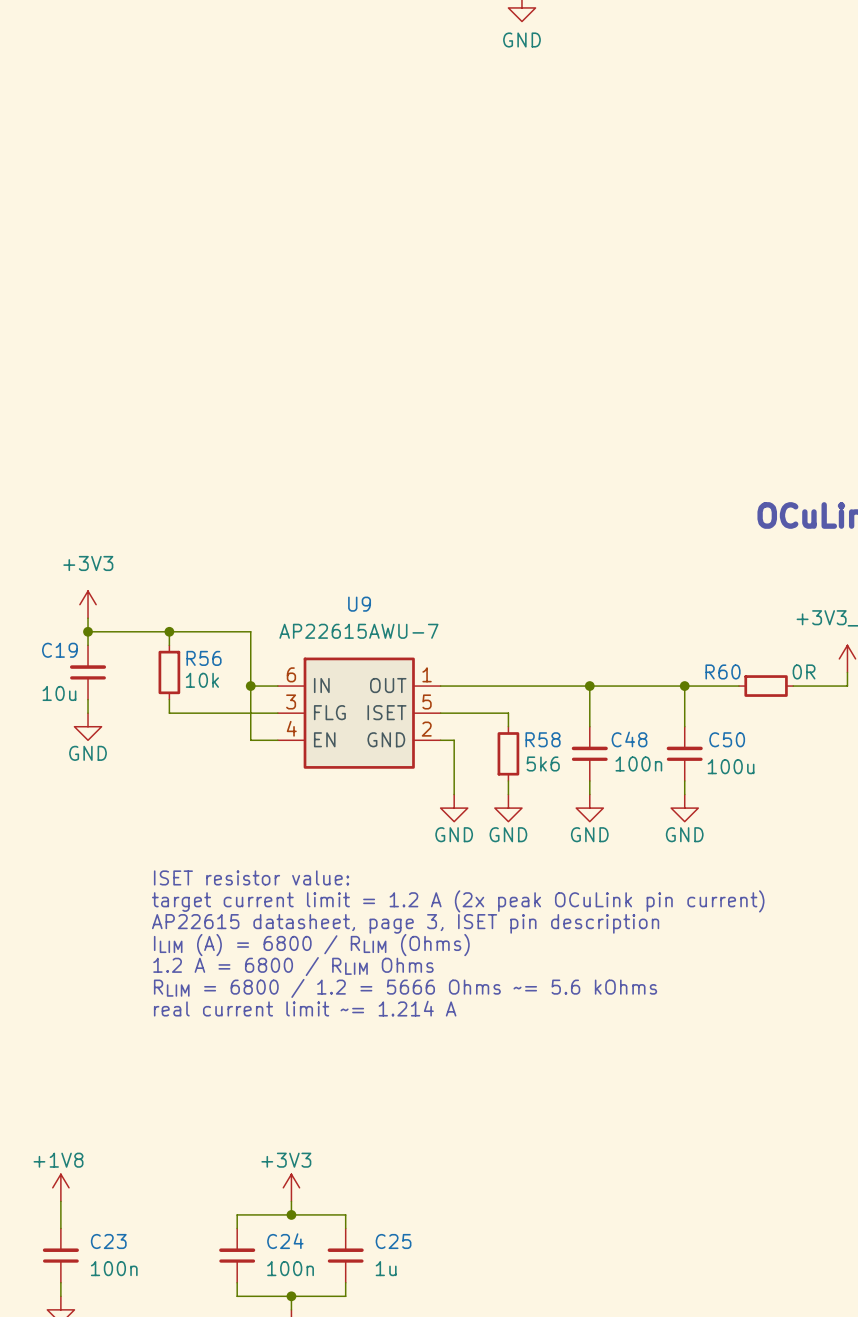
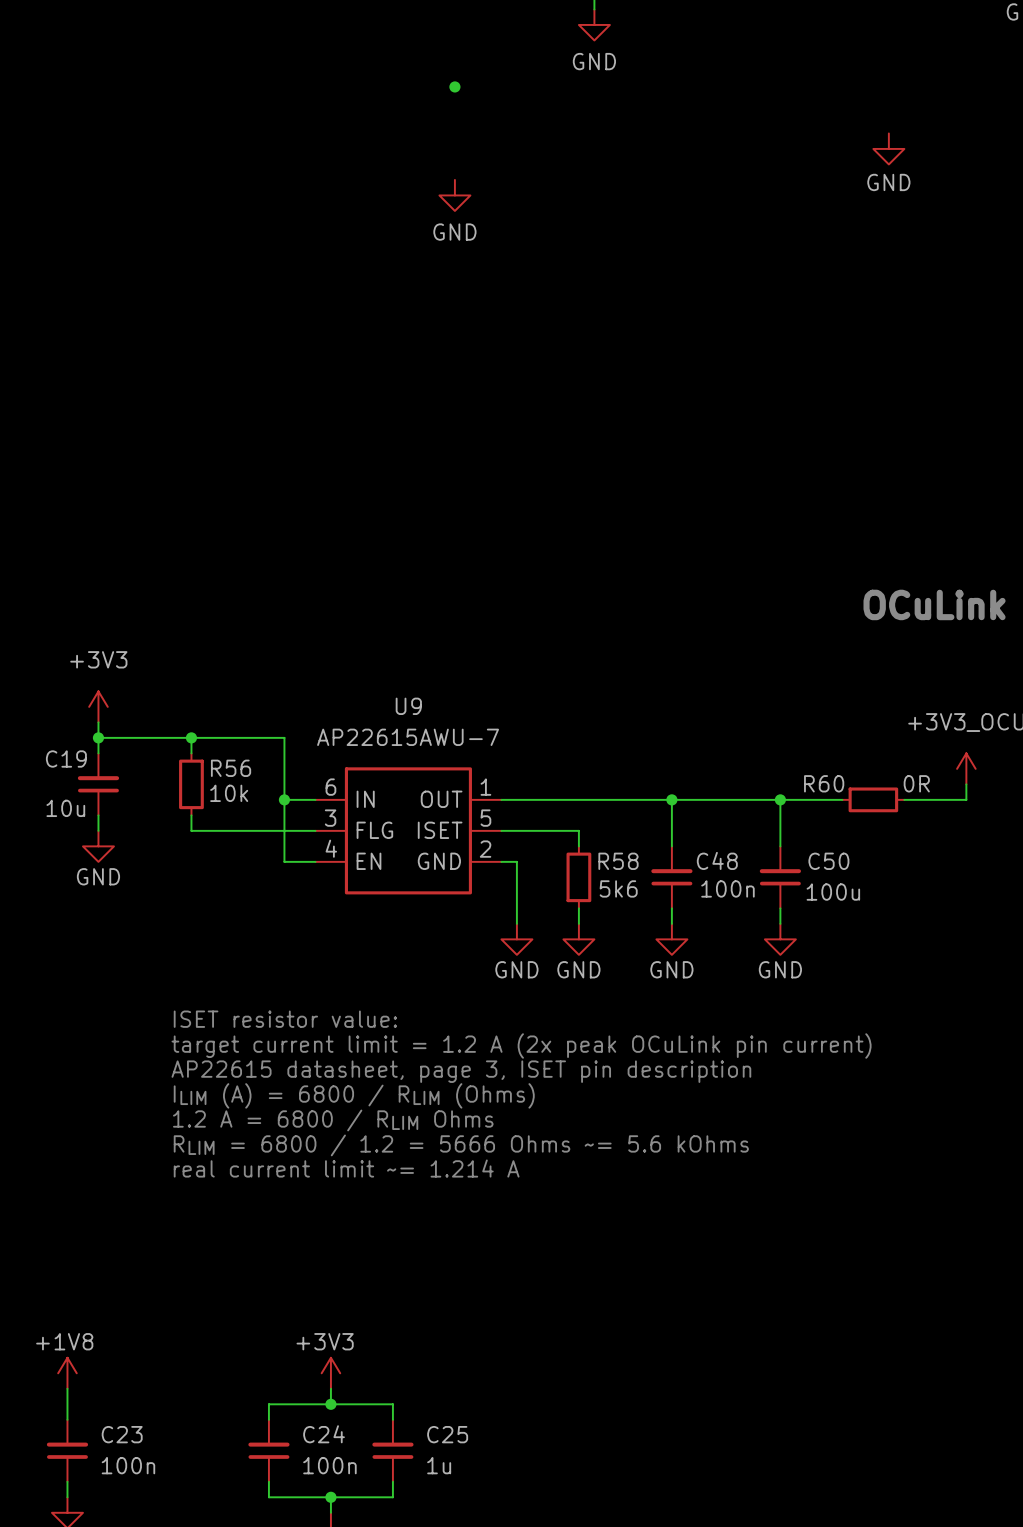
junction: none -> (454, 86)
power symbol: none -> GND (888, 148)
power symbol: none -> GND (454, 195)

